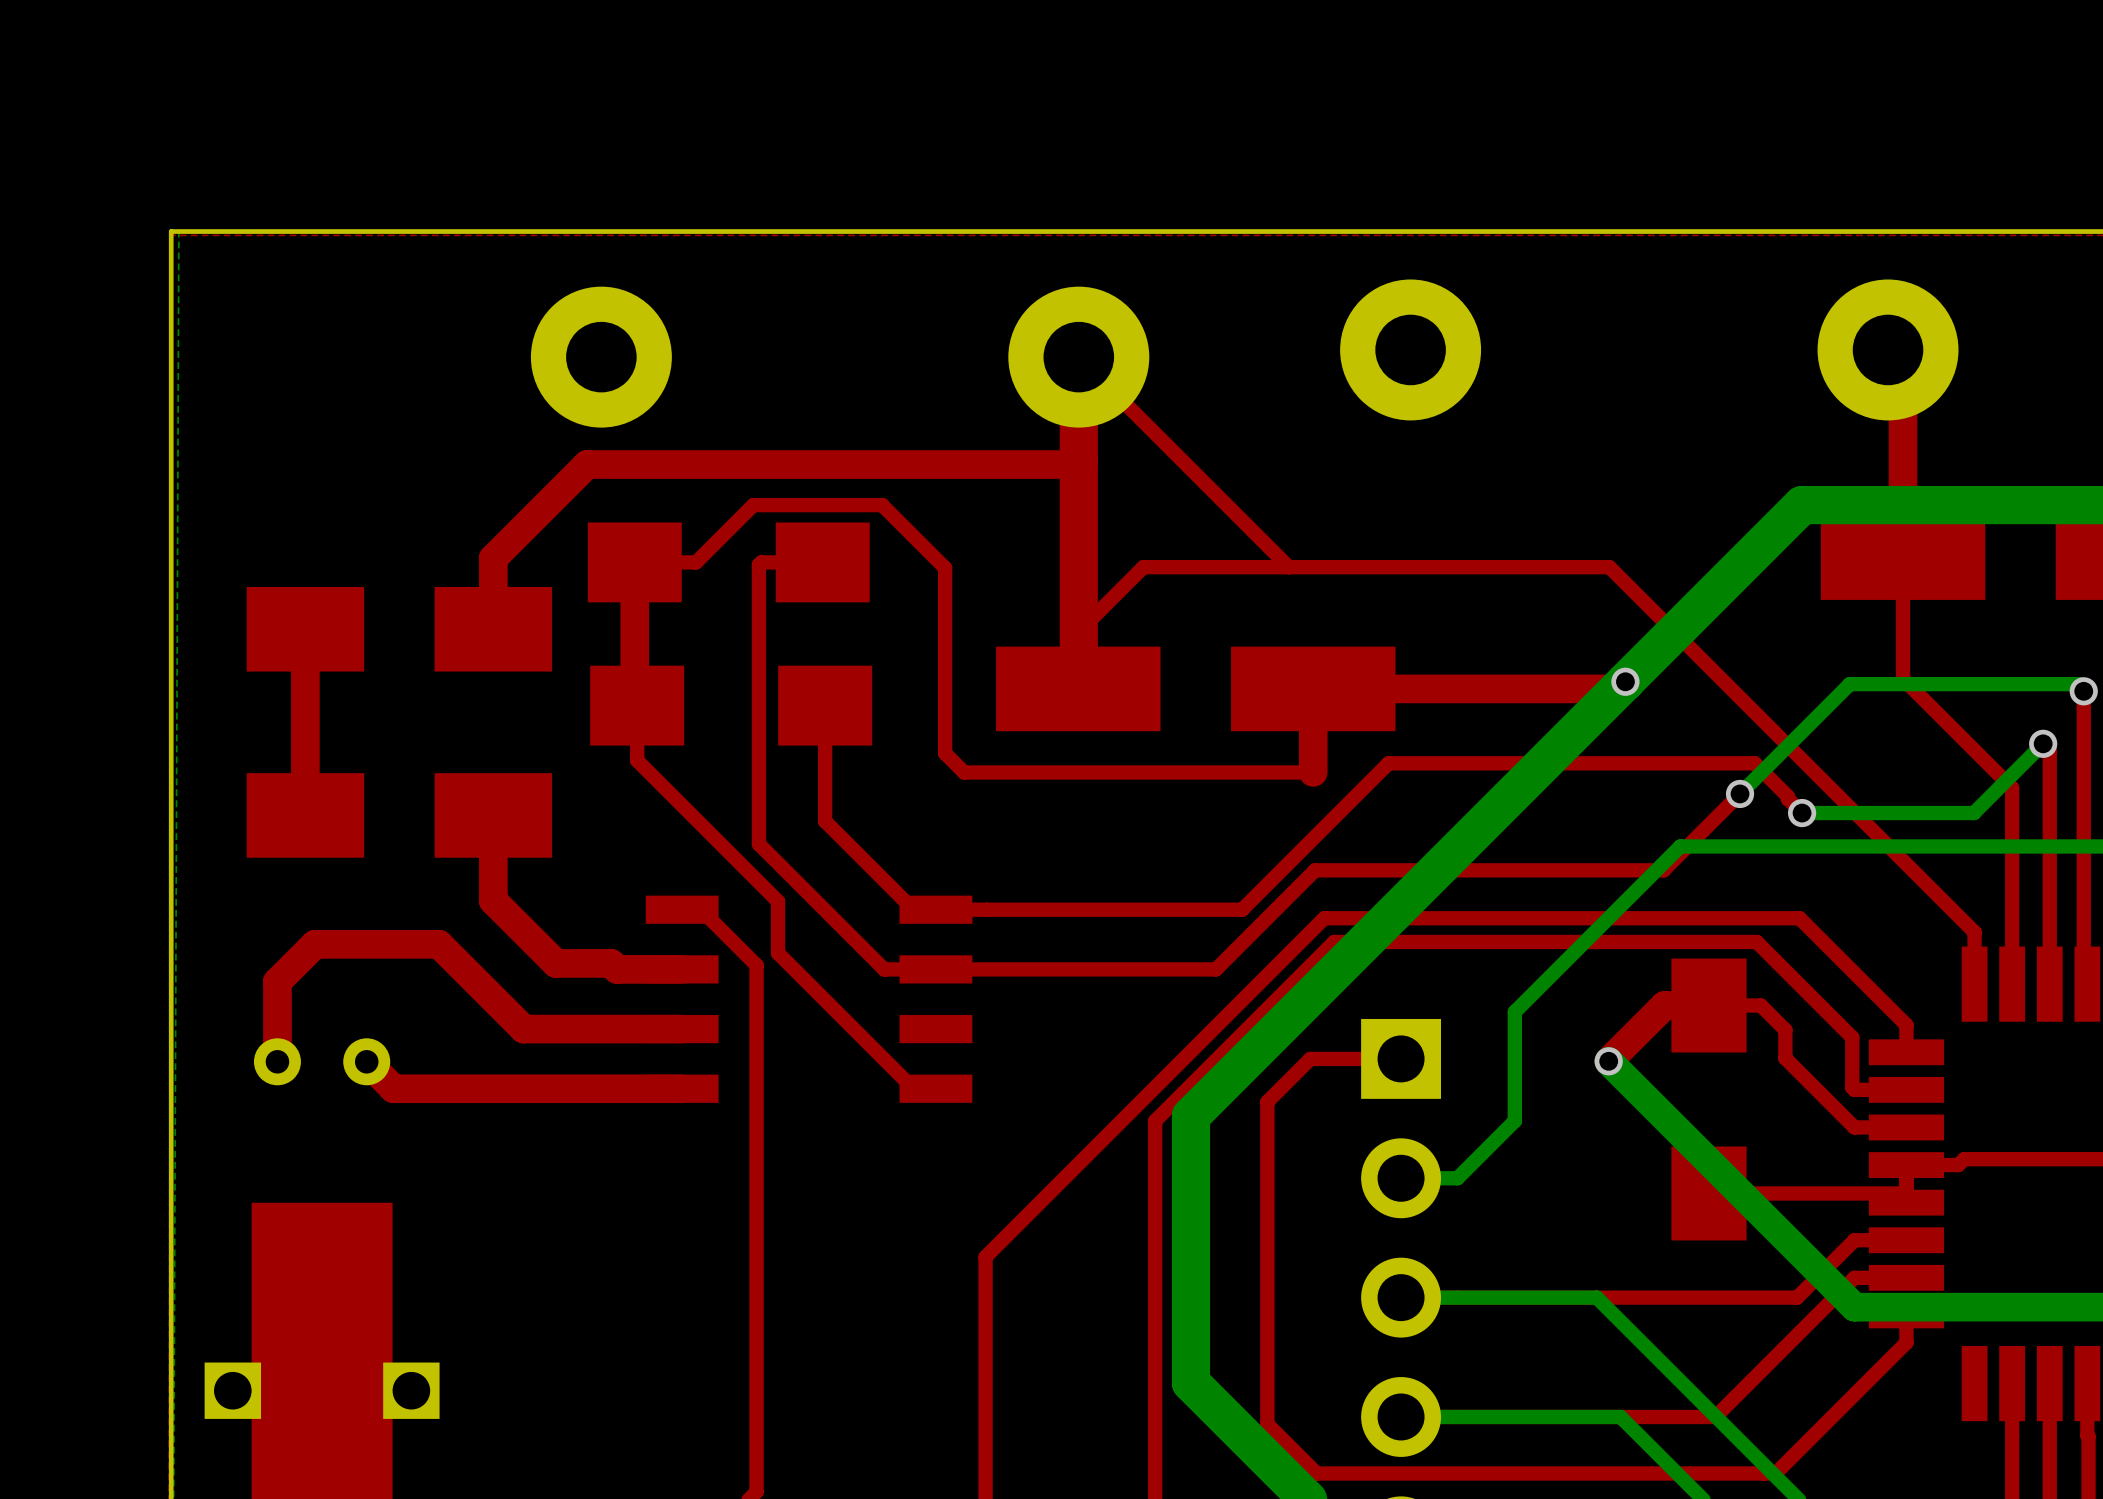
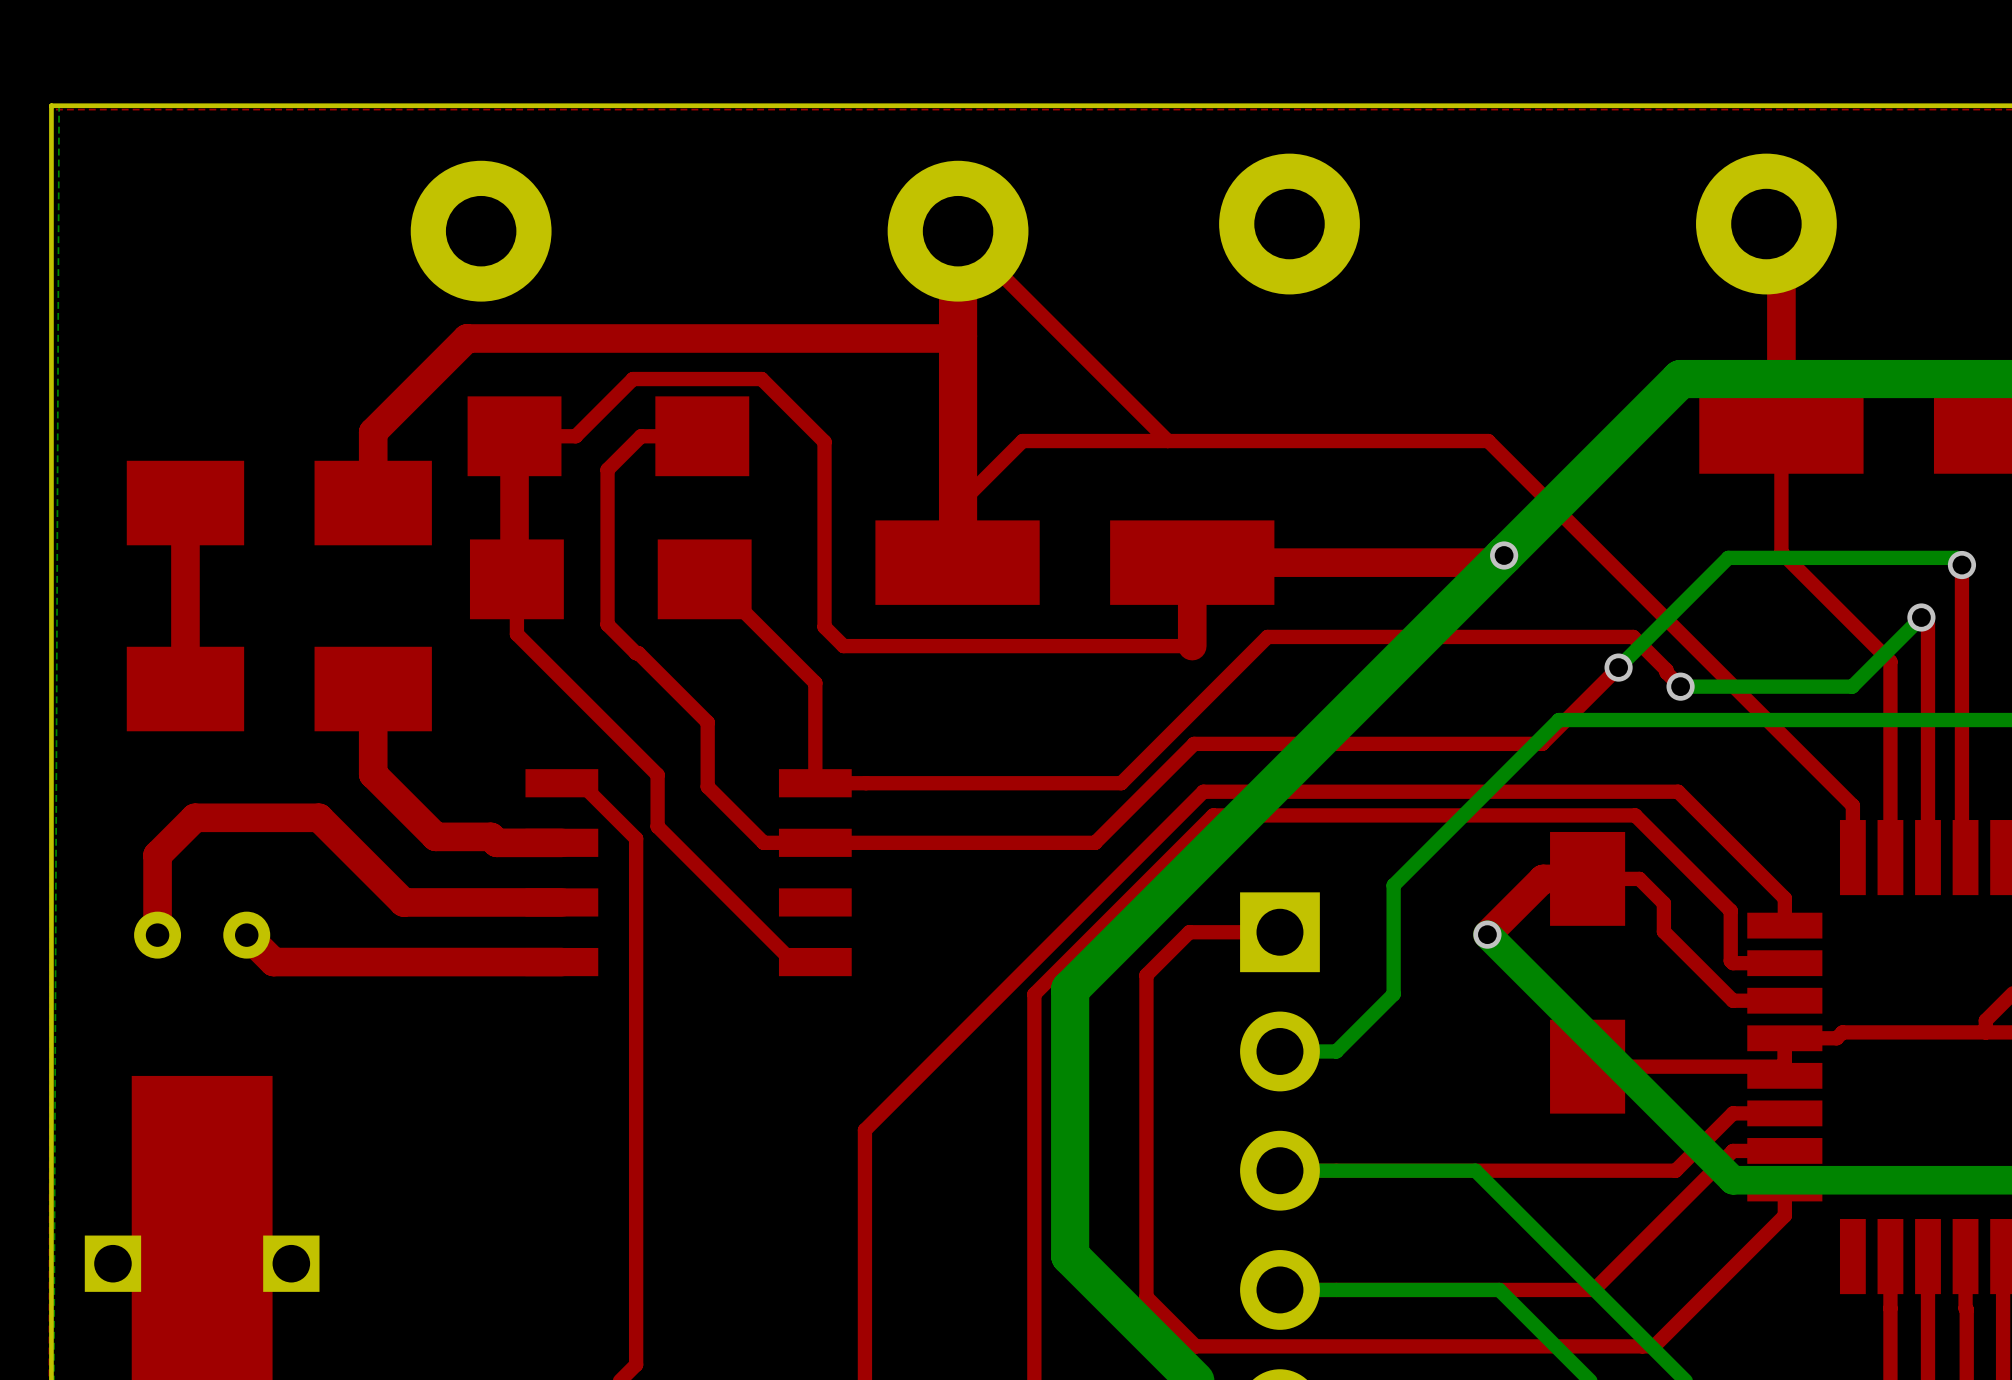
top track: (758, 564) (758, 844) (828, 913) -> (638, 438) (607, 469) (607, 624) (707, 722) (707, 786)
top track: (825, 705) (825, 821) (913, 909) (935, 909) -> (704, 579) (711, 579) (815, 682) (815, 783)

